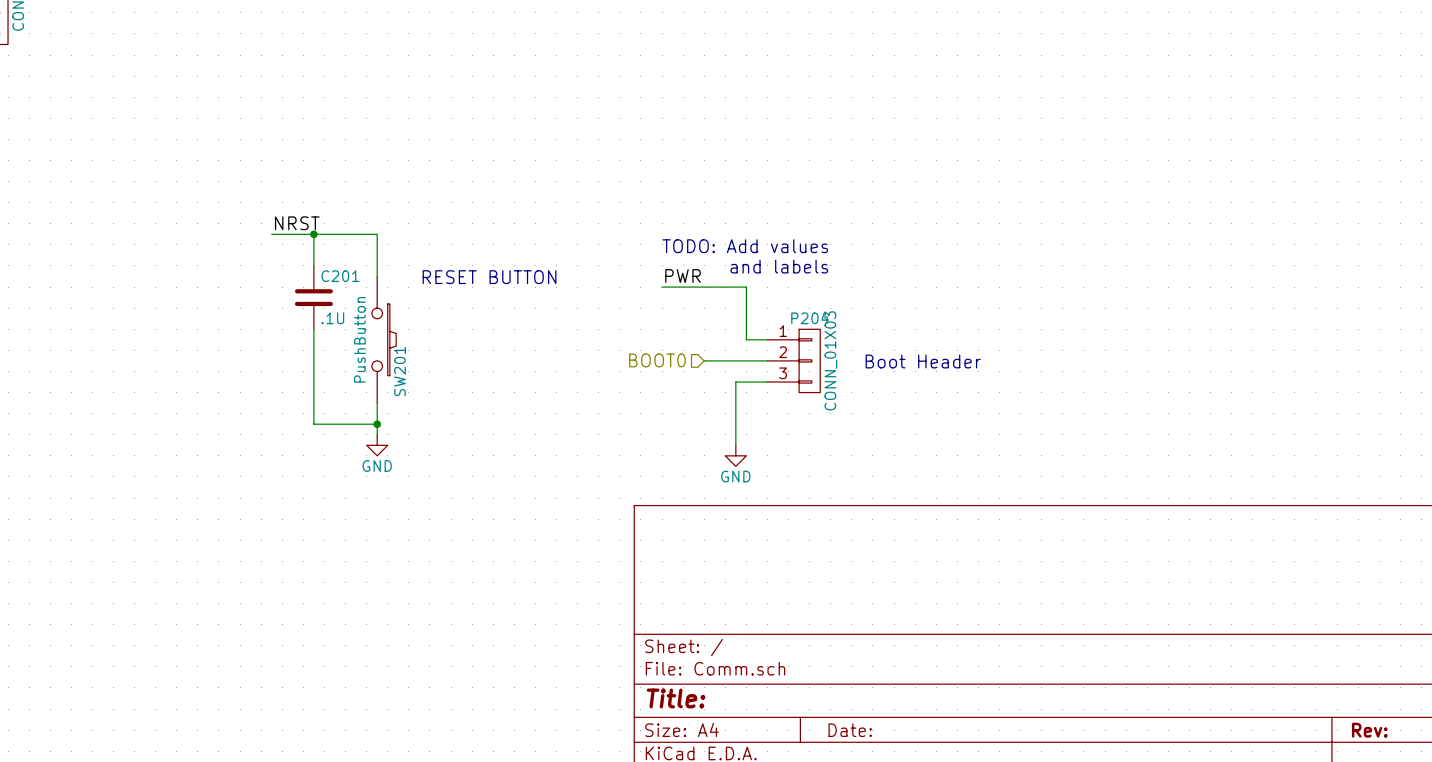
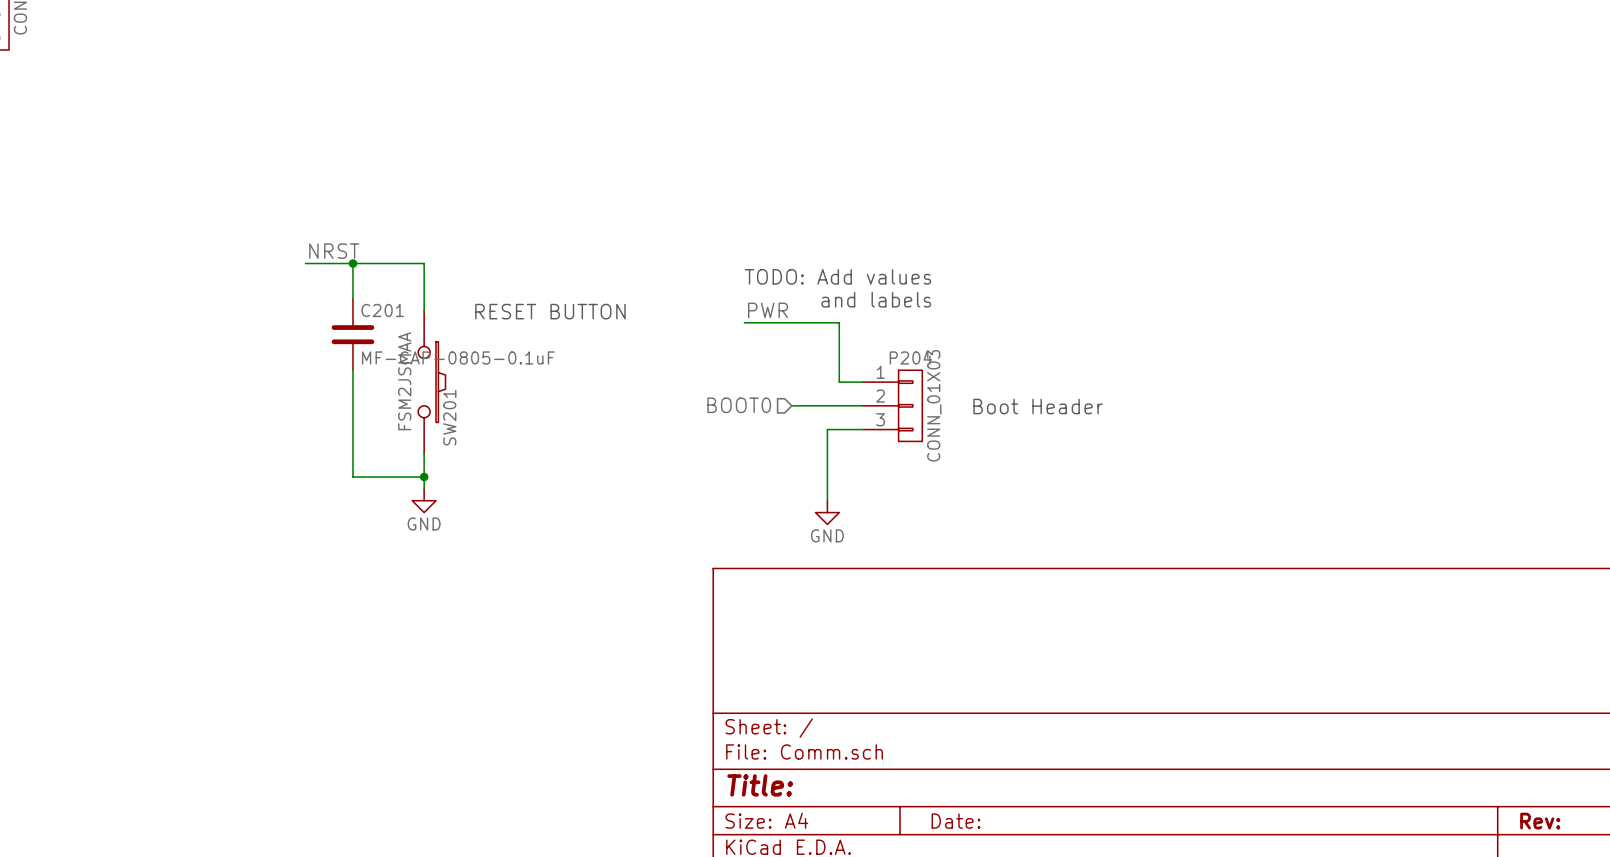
C201 value: .1U (332, 318) -> MF-CAP-0805-0.1uF (458, 357)
SW201 value: PushButton (359, 339) -> FSM2JSMAA (404, 381)

